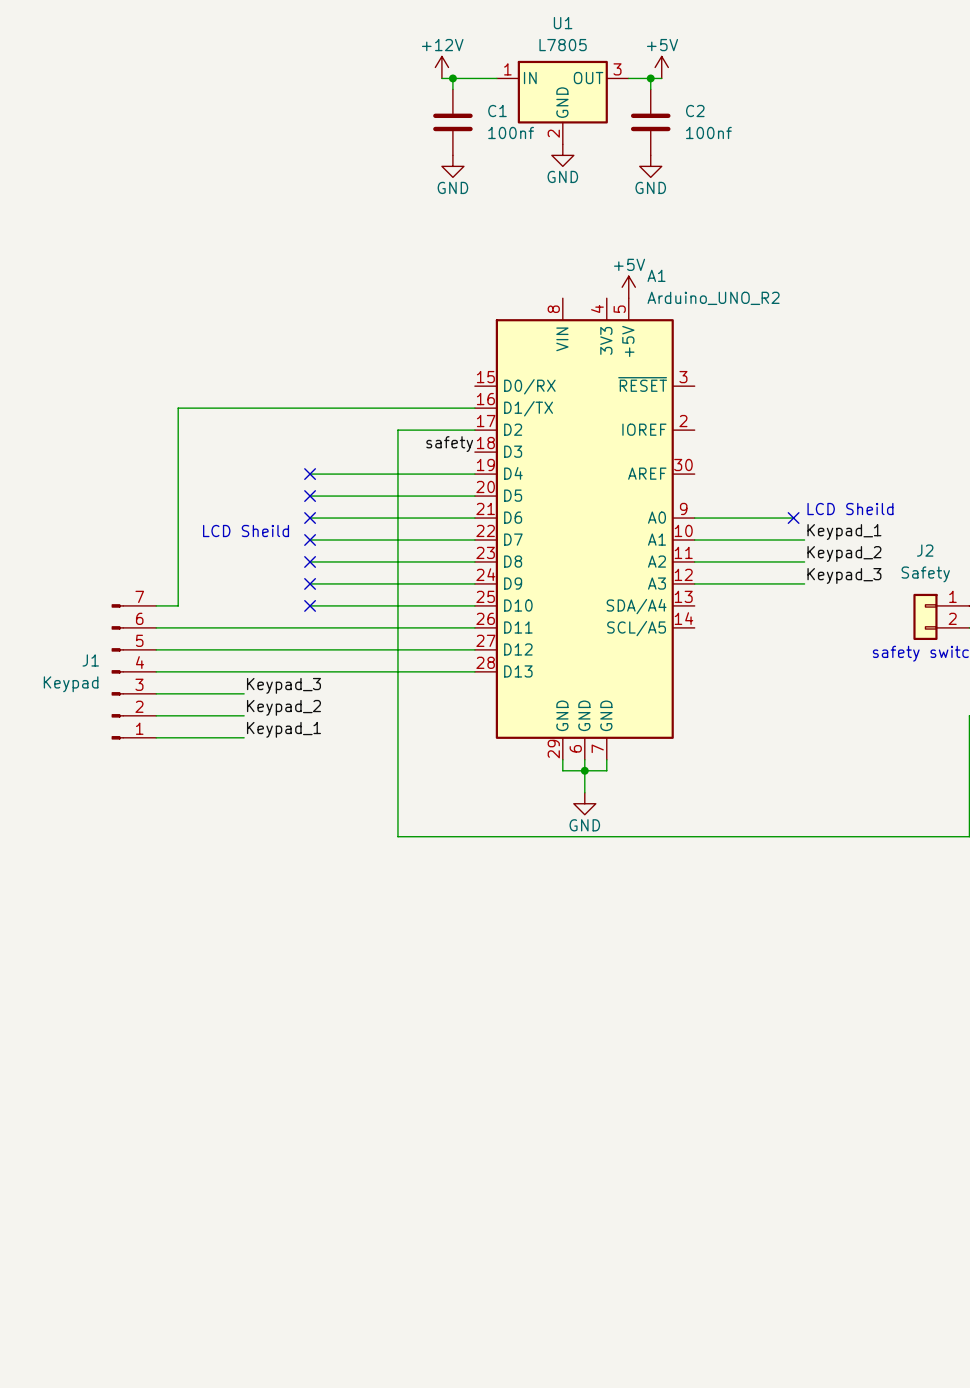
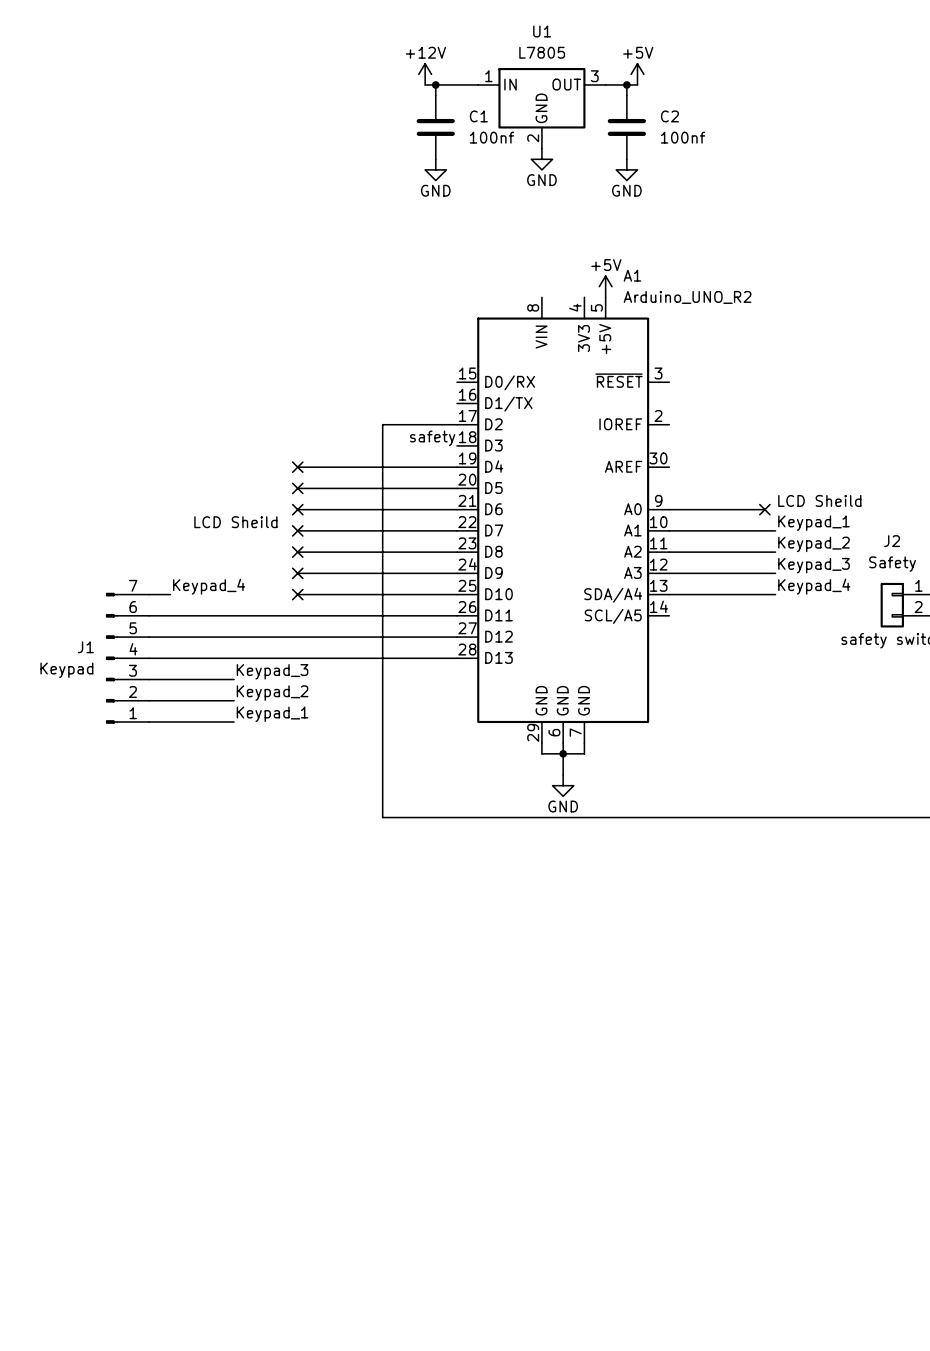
wire: (474, 408) (178, 408) (178, 605) -> none
label: none -> Keypad_4 (209, 586)
label: none -> Keypad_4 (814, 586)
wire: none -> (669, 594) (775, 594)

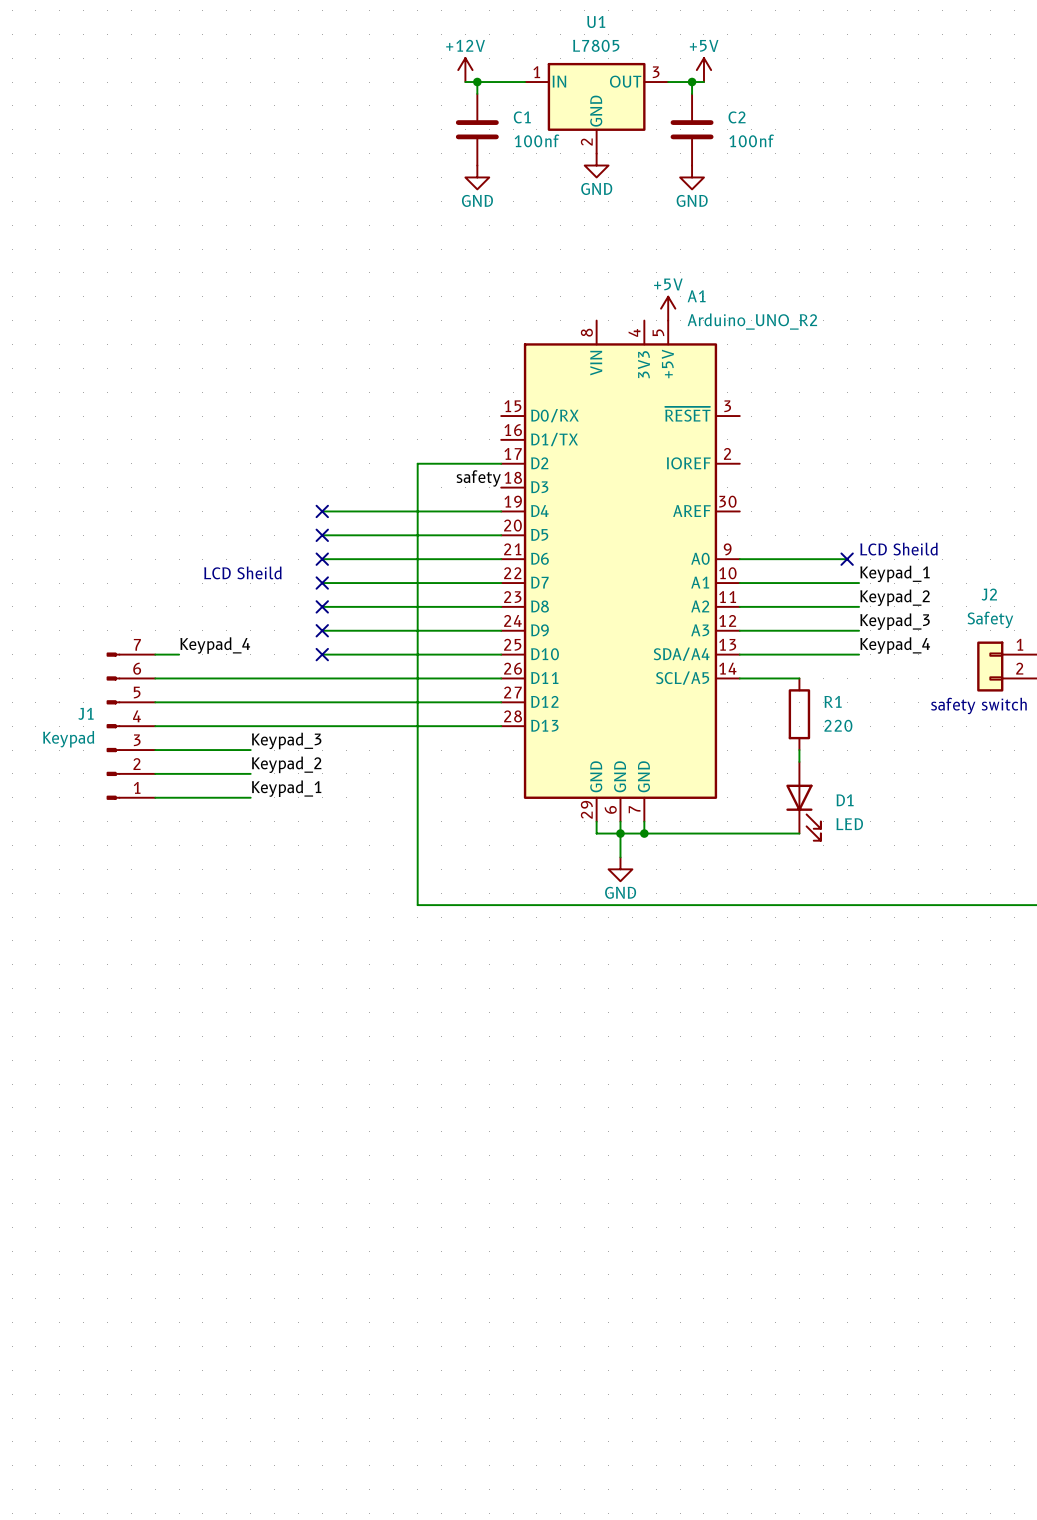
wire: none -> (739, 678) (799, 678)
R1: none -> 220 (799, 714)
wire: none -> (799, 750) (799, 761)
D1: none -> LED (803, 801)
wire: none -> (644, 833) (799, 833)
junction: none -> (644, 833)

